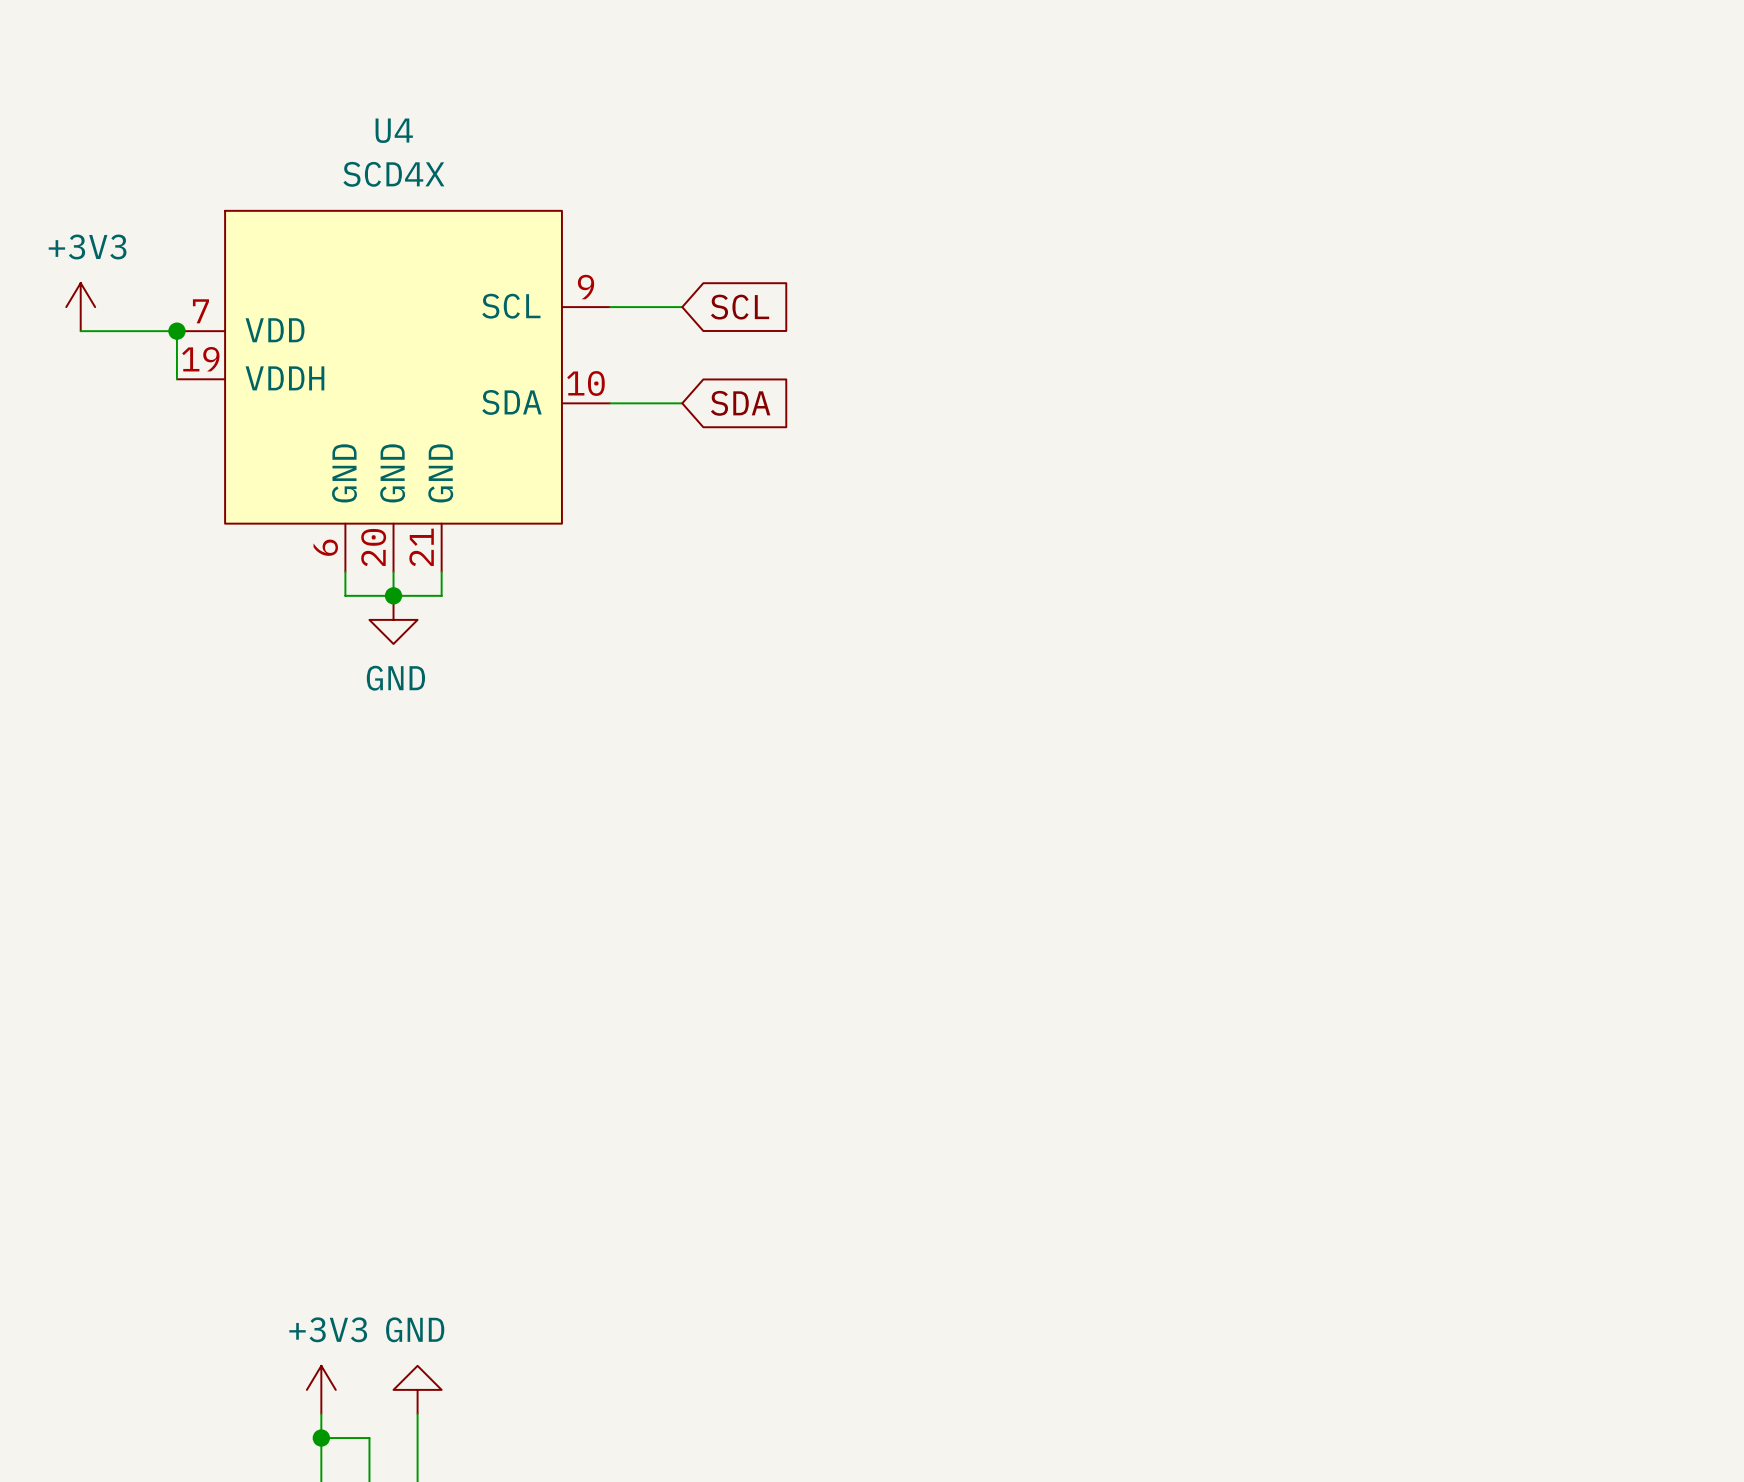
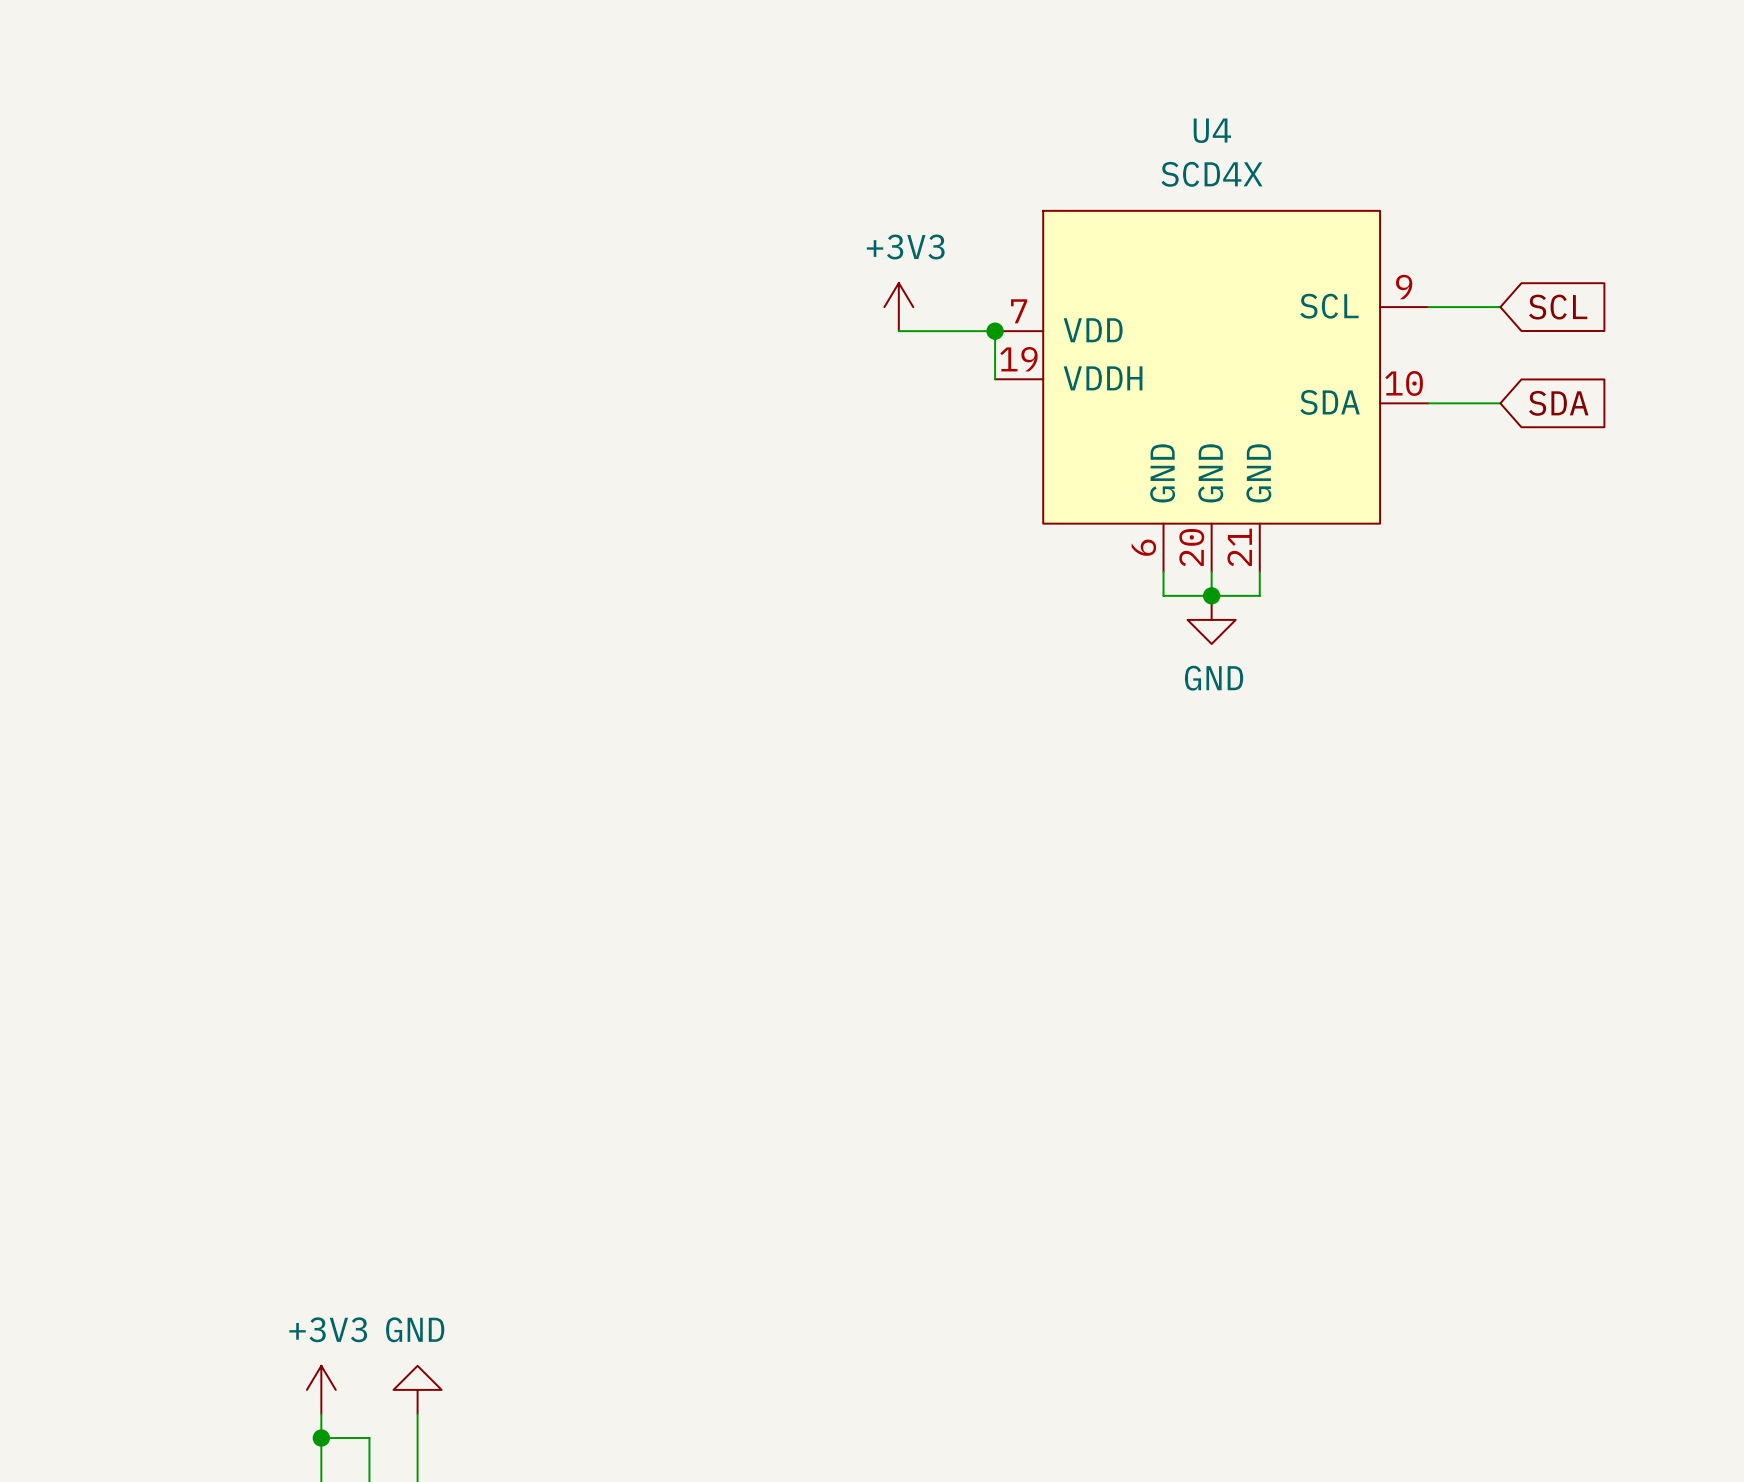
power symbol: +3V3 (80, 307) -> none
wire: (610, 307) (682, 307) -> none
global label: SCL (740, 307) -> none
power symbol: none -> +3V3 (898, 307)
wire: none -> (1428, 307) (1500, 307)
global label: none -> SCL (1558, 307)
wire: (80, 331) (176, 331) (176, 379) -> none
junction: (176, 331) -> none
wire: none -> (898, 331) (995, 331) (995, 379)
junction: none -> (995, 331)
U4 position: (393, 391) -> (1211, 391)
wire: (610, 403) (682, 403) -> none
global label: SDA (740, 403) -> none
wire: none -> (1428, 403) (1500, 403)
global label: none -> SDA (1558, 403)
wire: (345, 571) (345, 595) (441, 595) (441, 571) -> none
wire: (393, 571) (393, 595) -> none
wire: none -> (1163, 571) (1163, 595) (1259, 595) (1259, 571)
wire: none -> (1211, 571) (1211, 595)
junction: (393, 595) -> none
junction: none -> (1211, 595)
power symbol: GND (393, 619) -> none
power symbol: none -> GND (1211, 619)

